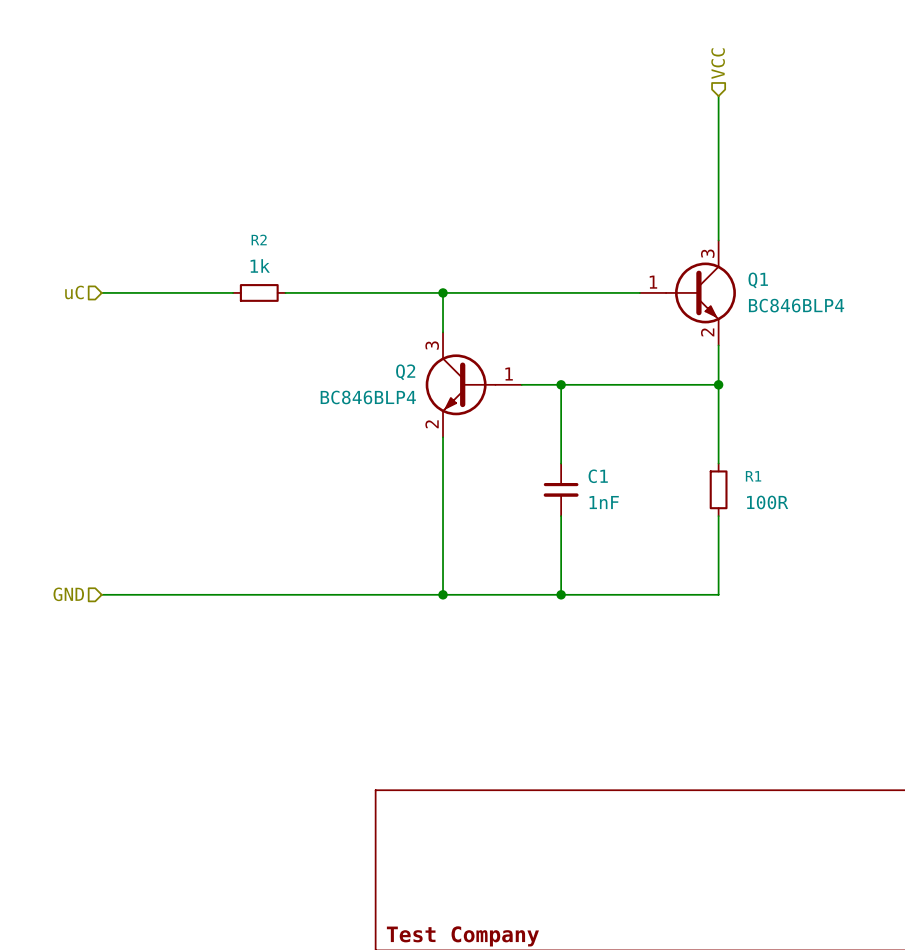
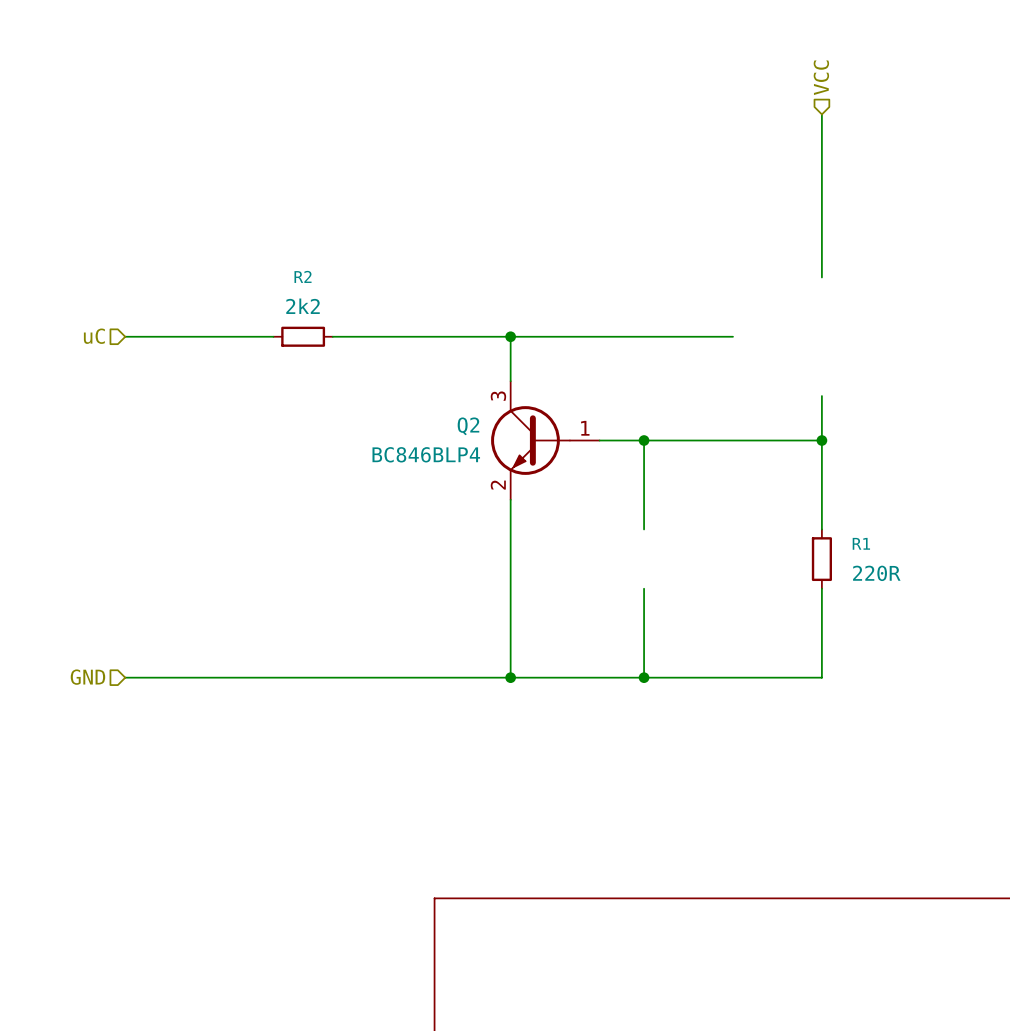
R2 value: 1k (260, 265) -> 2k2 (303, 306)
Q1: BC846BLP4 (687, 292) -> none
C1: 1nF (561, 489) -> none
R1 value: 100R (767, 502) -> 220R (876, 573)

